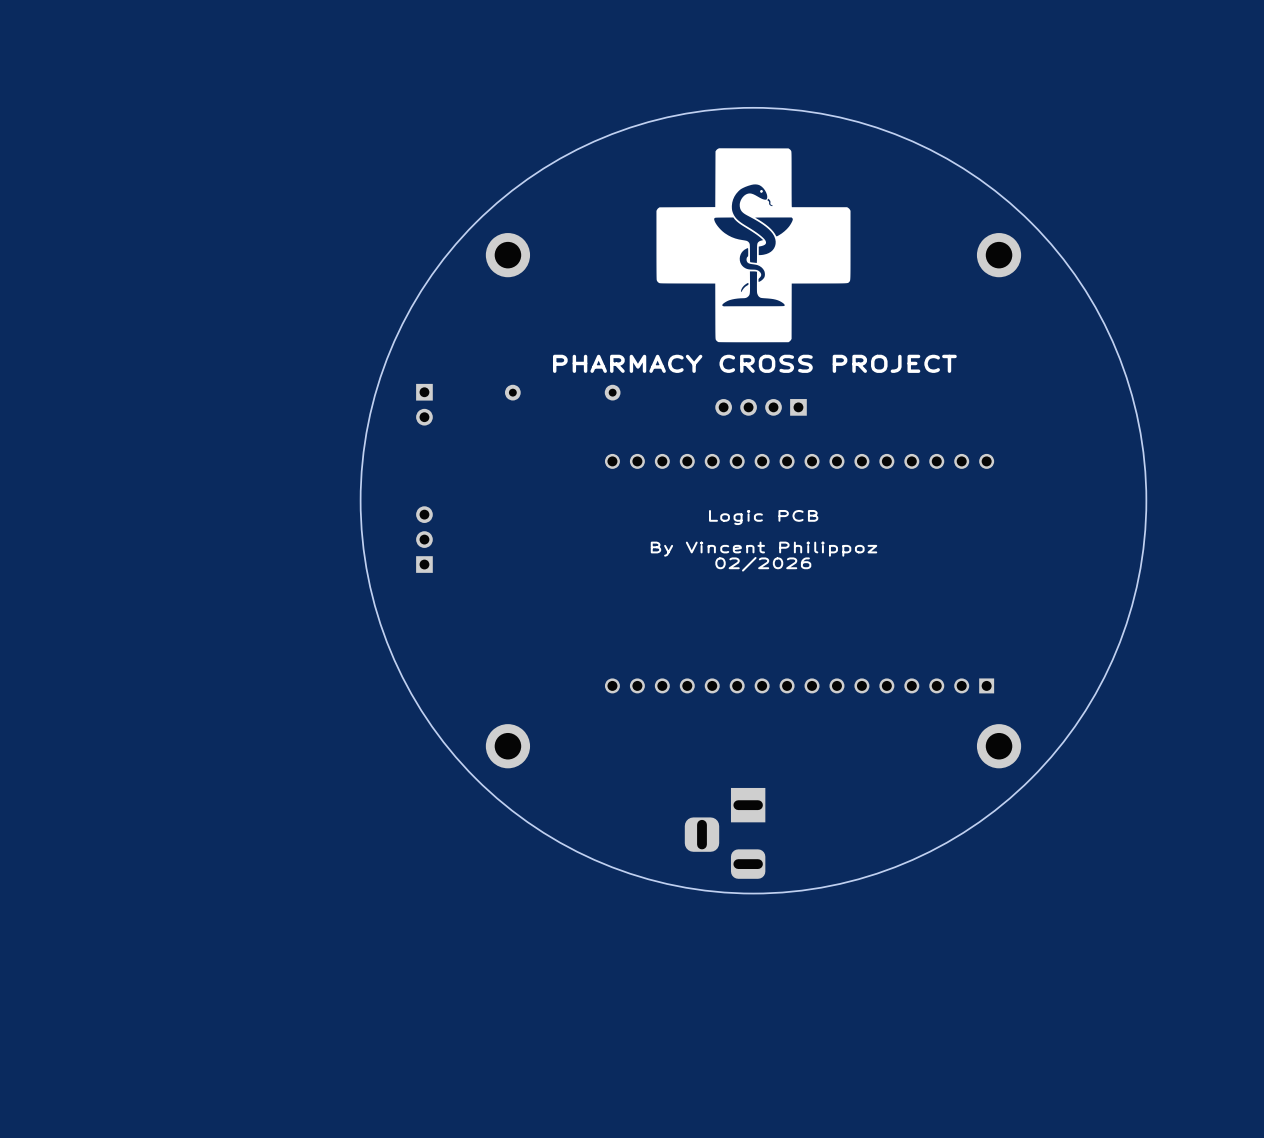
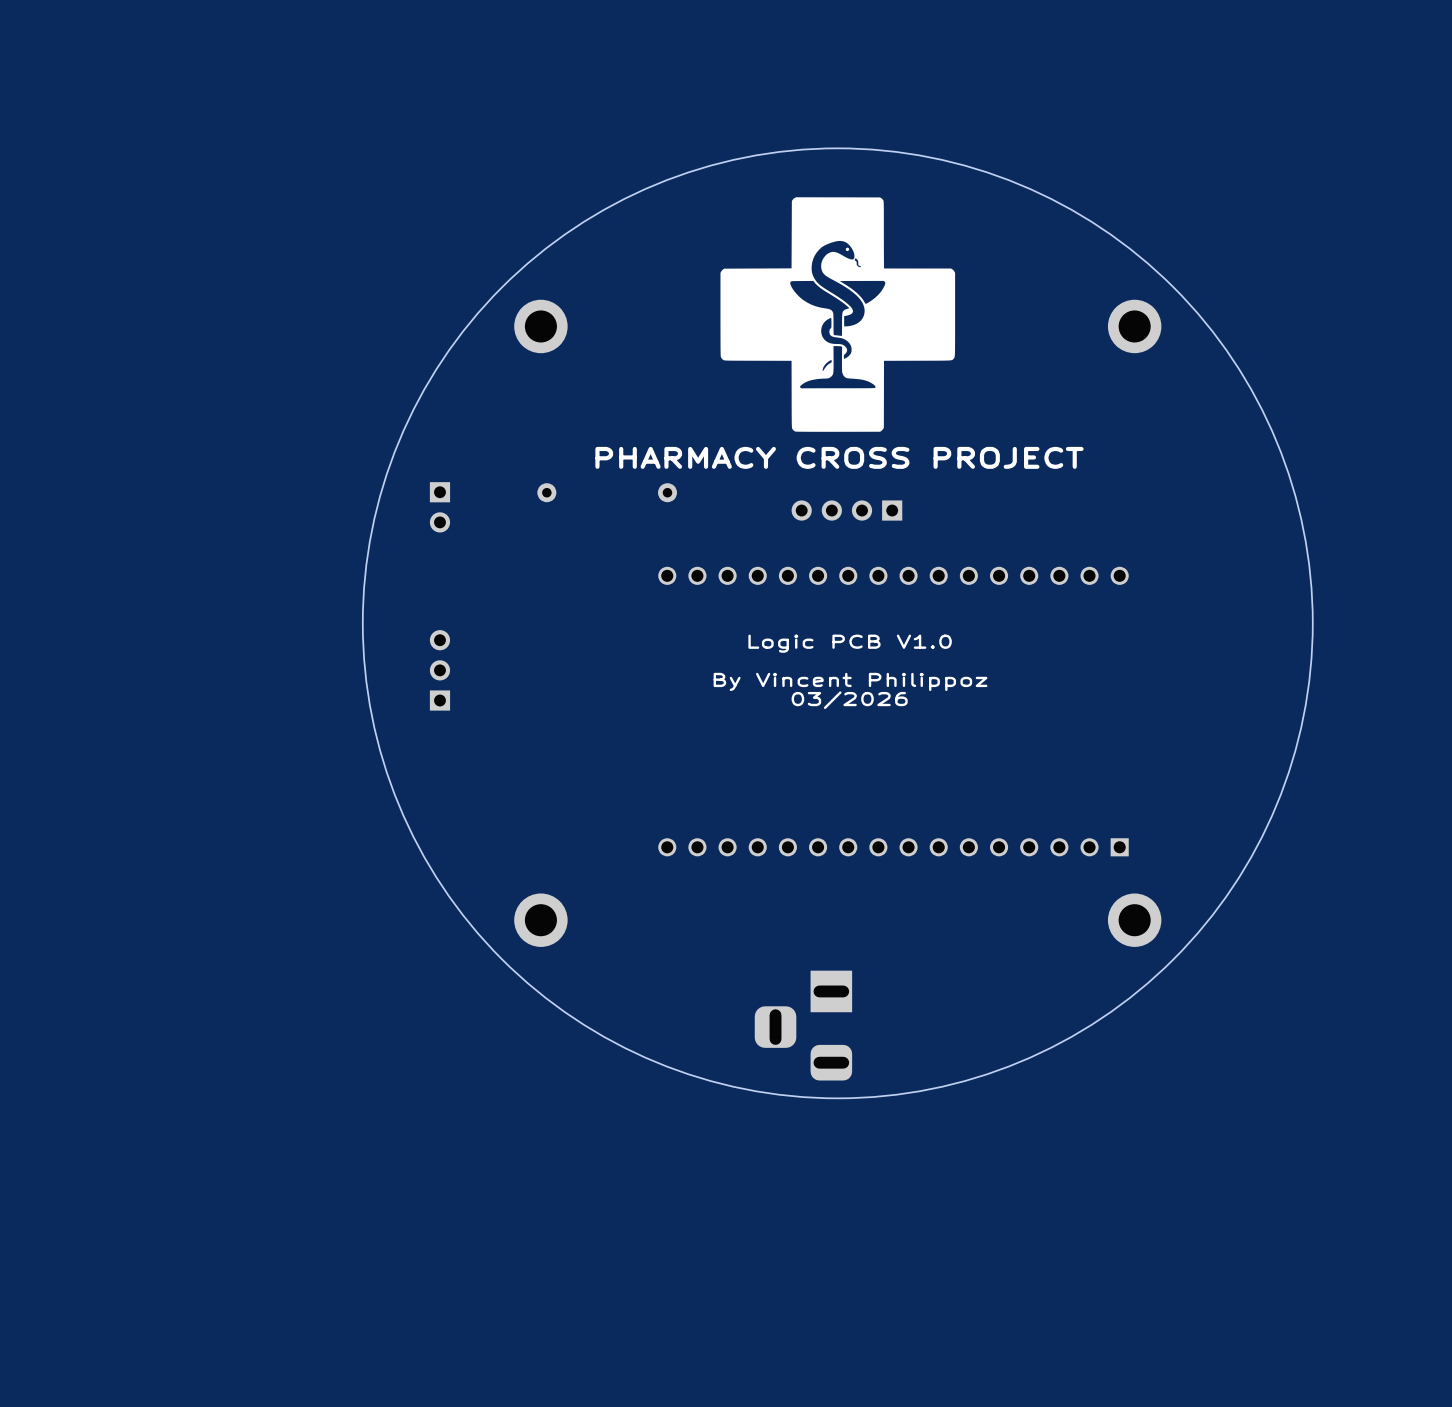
text: Logic PCB (763, 517) -> Logic PCB V1.0 (850, 643)
text: 02/2026 (763, 564) -> 03/2026 (849, 700)

